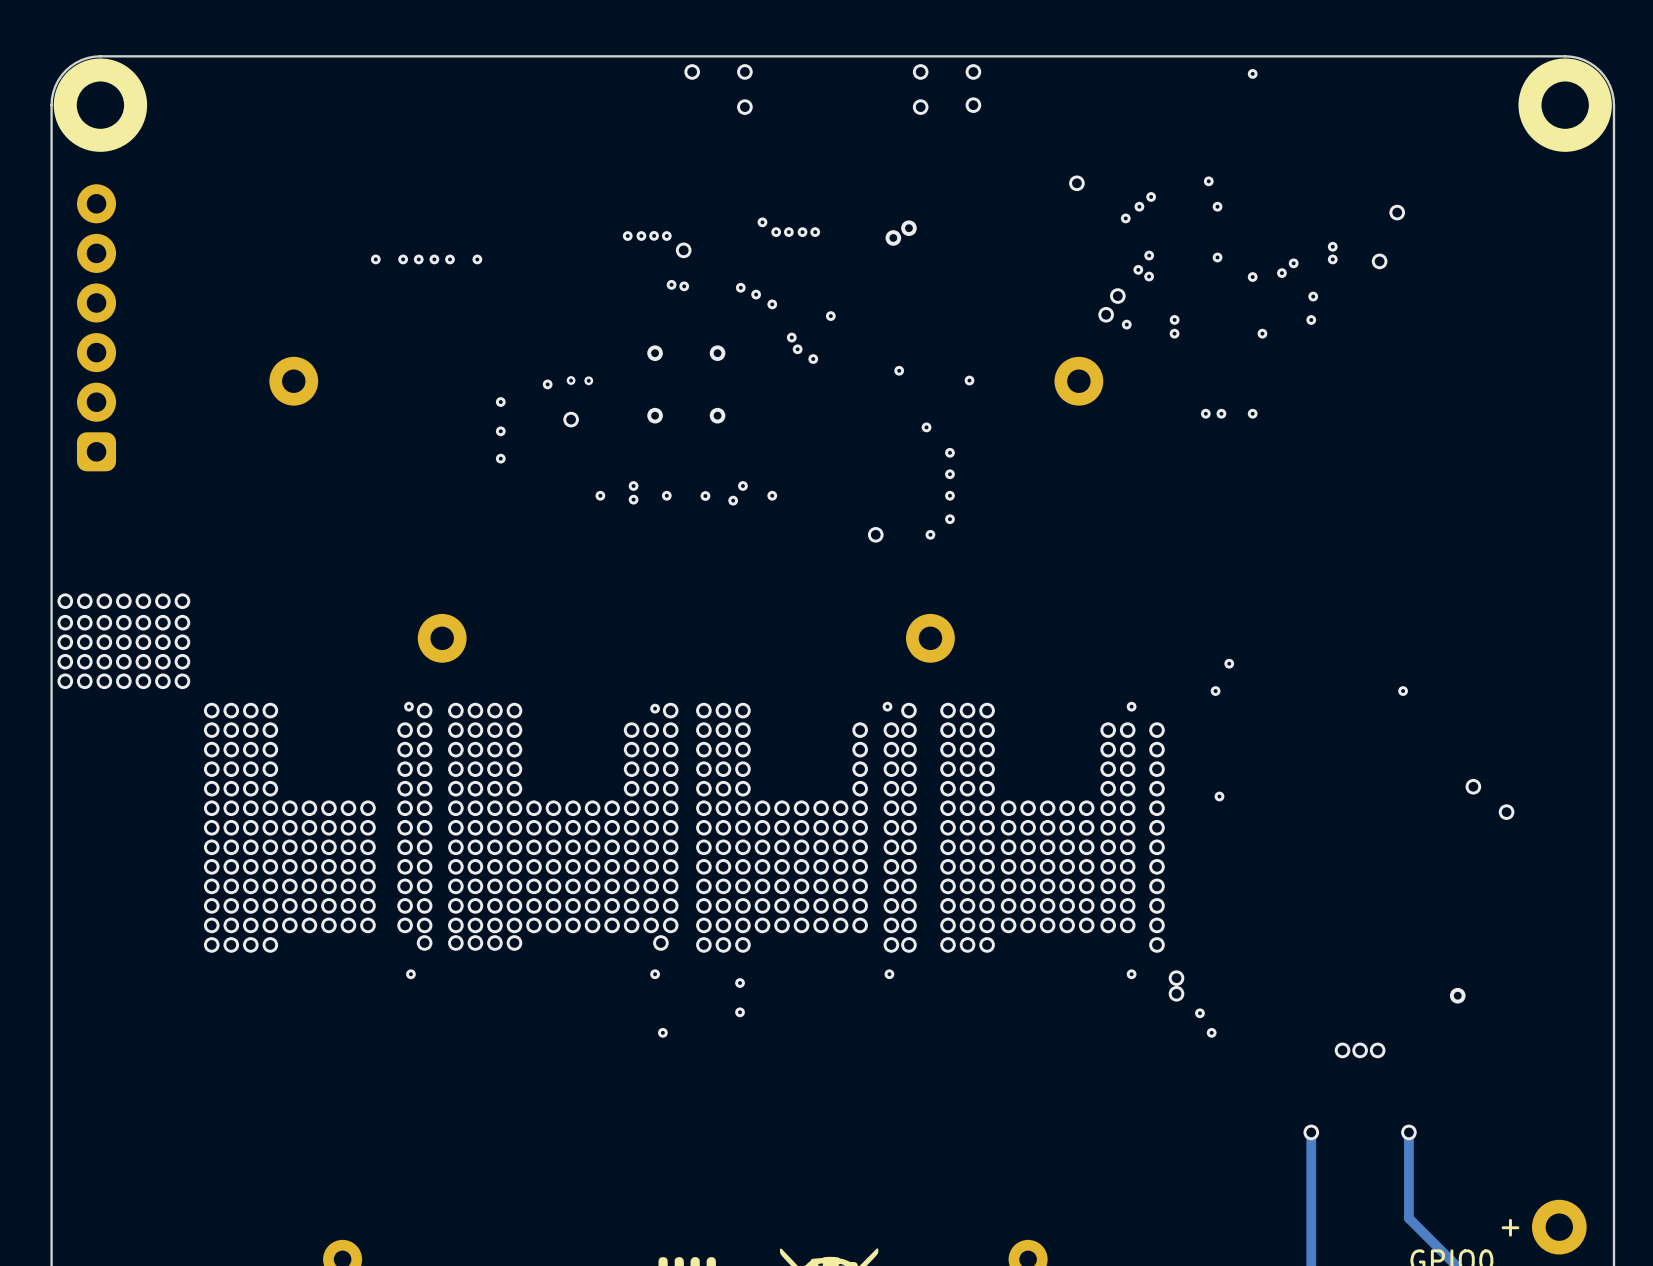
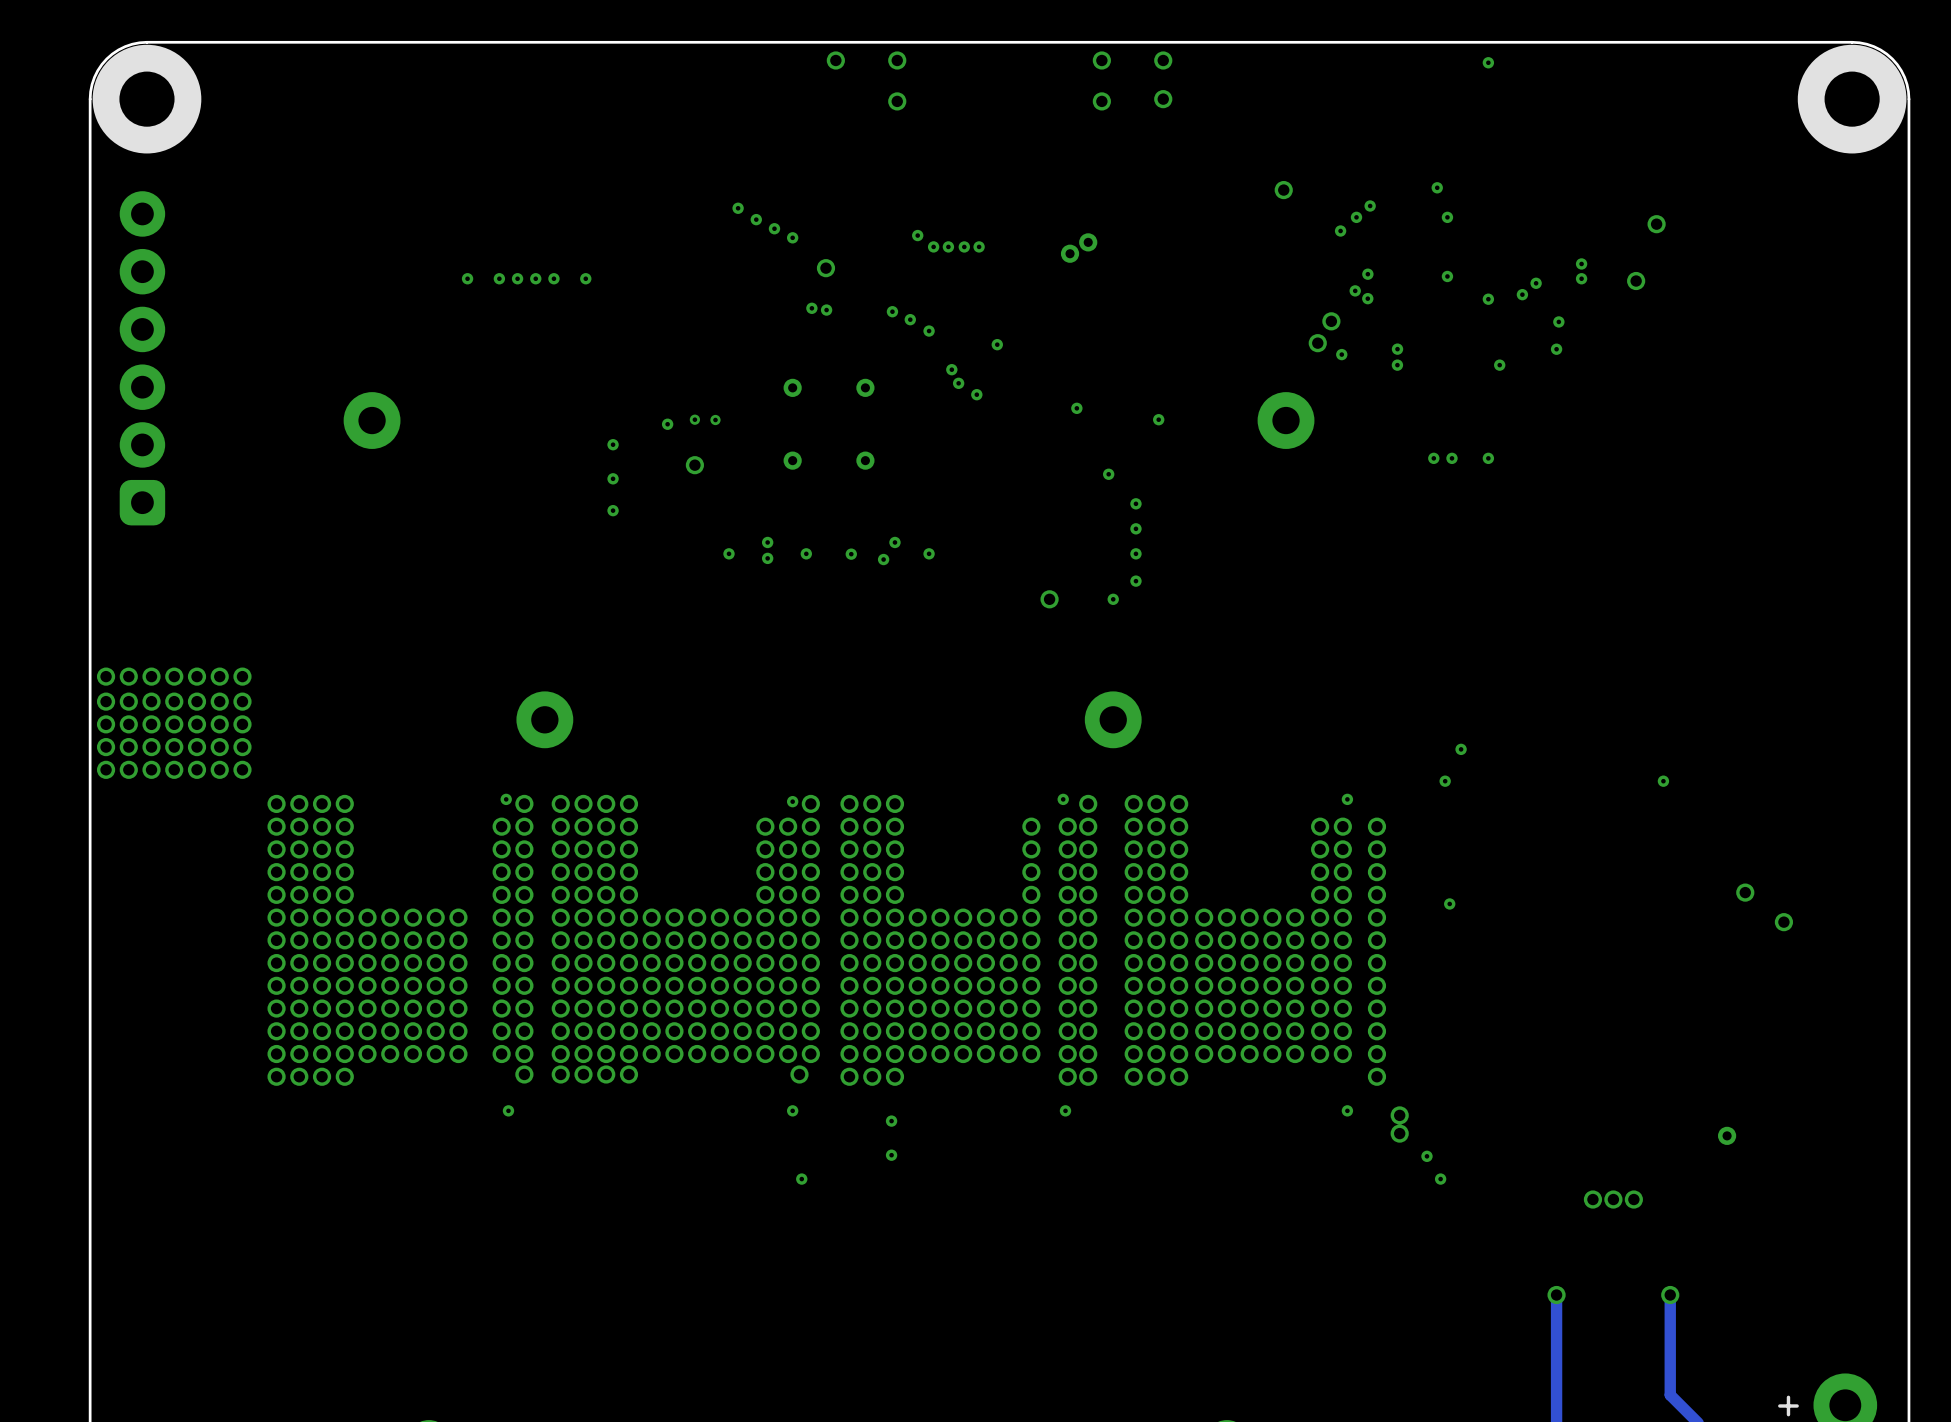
via: none -> (738, 208)
via: none -> (756, 219)
via: none -> (774, 228)
via: none -> (792, 237)
via: (654, 235) -> none
via: (627, 236) -> none
via: (641, 236) -> none
via: (666, 236) -> none

